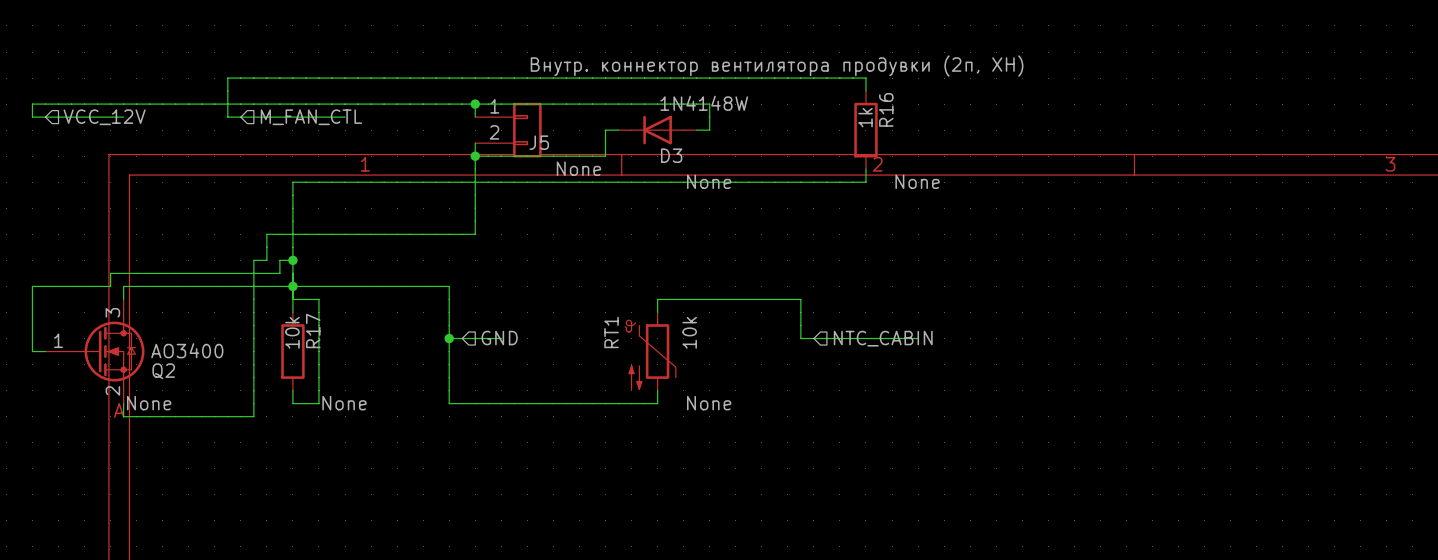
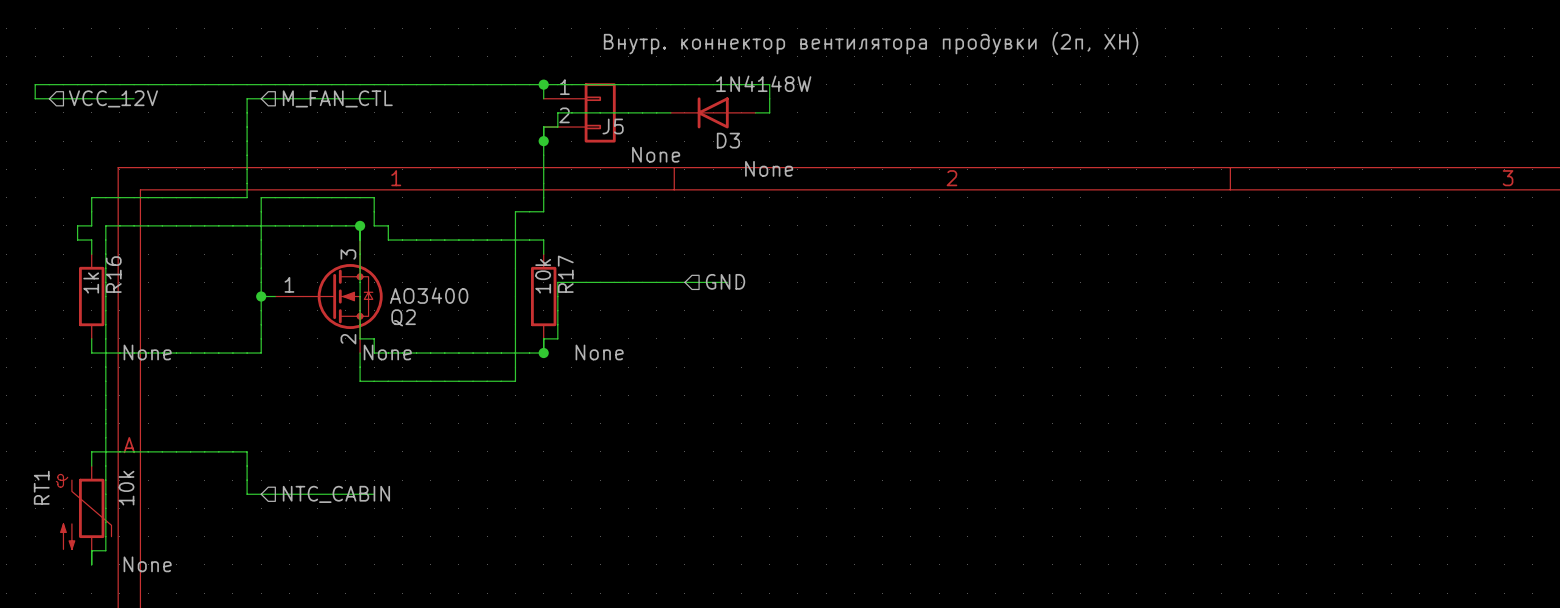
wire: (227, 78) (227, 91) -> (247, 84) (35, 84) (35, 98) (134, 98)
junction: none -> (543, 84)
wire: (709, 78) (865, 78) (865, 91) -> none
wire: none -> (247, 98) (374, 98)
wire: (475, 104) (475, 117) -> (543, 84) (543, 98)
junction: (475, 104) -> none
wire: (514, 104) (32, 104) (32, 117) (123, 117) -> none
wire: (709, 104) (709, 130) (696, 130) -> (769, 112) (769, 84)
hierarchical label position: VCC_12V (104, 117) -> VCC_12V (113, 98)
wire: (227, 117) (345, 117) -> (247, 127) (247, 197) (91, 197) (91, 225) (77, 225) (77, 240) (91, 240) (91, 254)
hierarchical label position: M_FAN_CTL (311, 117) -> M_FAN_CTL (337, 98)
junction: none -> (543, 141)
J5 position: (508, 130) -> (579, 112)
wire: (618, 130) (605, 130) (605, 156) (475, 156) -> none
D3 position: (657, 130) -> (713, 112)
R16 position: (865, 130) -> (91, 296)
wire: (475, 143) (475, 195) -> (557, 112) (557, 127) (543, 127) (543, 211) (515, 211)
junction: (475, 156) -> none
wire: (865, 169) (865, 182) (345, 182) -> (543, 254) (543, 240) (388, 240) (388, 225) (374, 225) (374, 197)
wire: (292, 182) (292, 312) -> (317, 197) (261, 197) (261, 353) (91, 353) (91, 338)
junction: none -> (360, 225)
wire: (475, 234) (266, 234) (266, 260) (253, 260) (253, 416) (227, 416) -> (515, 254) (515, 381) (360, 381) (360, 353)
wire: (292, 260) (279, 260) (279, 273) (253, 273) -> none
junction: (292, 260) -> none
wire: none -> (727, 282) (557, 282) (557, 338) (543, 338) (543, 353) (374, 353) (374, 338) (360, 338) (360, 225) (105, 225) (105, 550) (91, 550) (91, 564)
wire: (240, 273) (110, 273) (110, 286) (32, 286) (32, 351) (45, 351) -> none
junction: none -> (261, 296)
junction: (292, 286) -> none
wire: (123, 299) (123, 286) (449, 286) (449, 403) (657, 403) (657, 390) -> none
wire: (292, 299) (318, 299) (318, 403) (292, 403) (292, 390) -> none
wire: (657, 312) (657, 299) (800, 299) (800, 338) (918, 338) -> none
wire: (449, 338) (501, 338) -> none
junction position: (449, 338) -> (543, 353)
hierarchical label position: GND (499, 338) -> GND (725, 281)
hierarchical label: NTC_CABIN (883, 338) -> none
Q2 position: (94, 351) -> (329, 296)
R17 position: (292, 351) -> (543, 296)
RT1 position: (650, 351) -> (83, 508)
wire: (123, 403) (123, 416) -> (91, 466) (91, 451) (134, 451)
wire: none -> (247, 451) (247, 494) (374, 494)
hierarchical label: none -> NTC_CABIN (336, 494)

